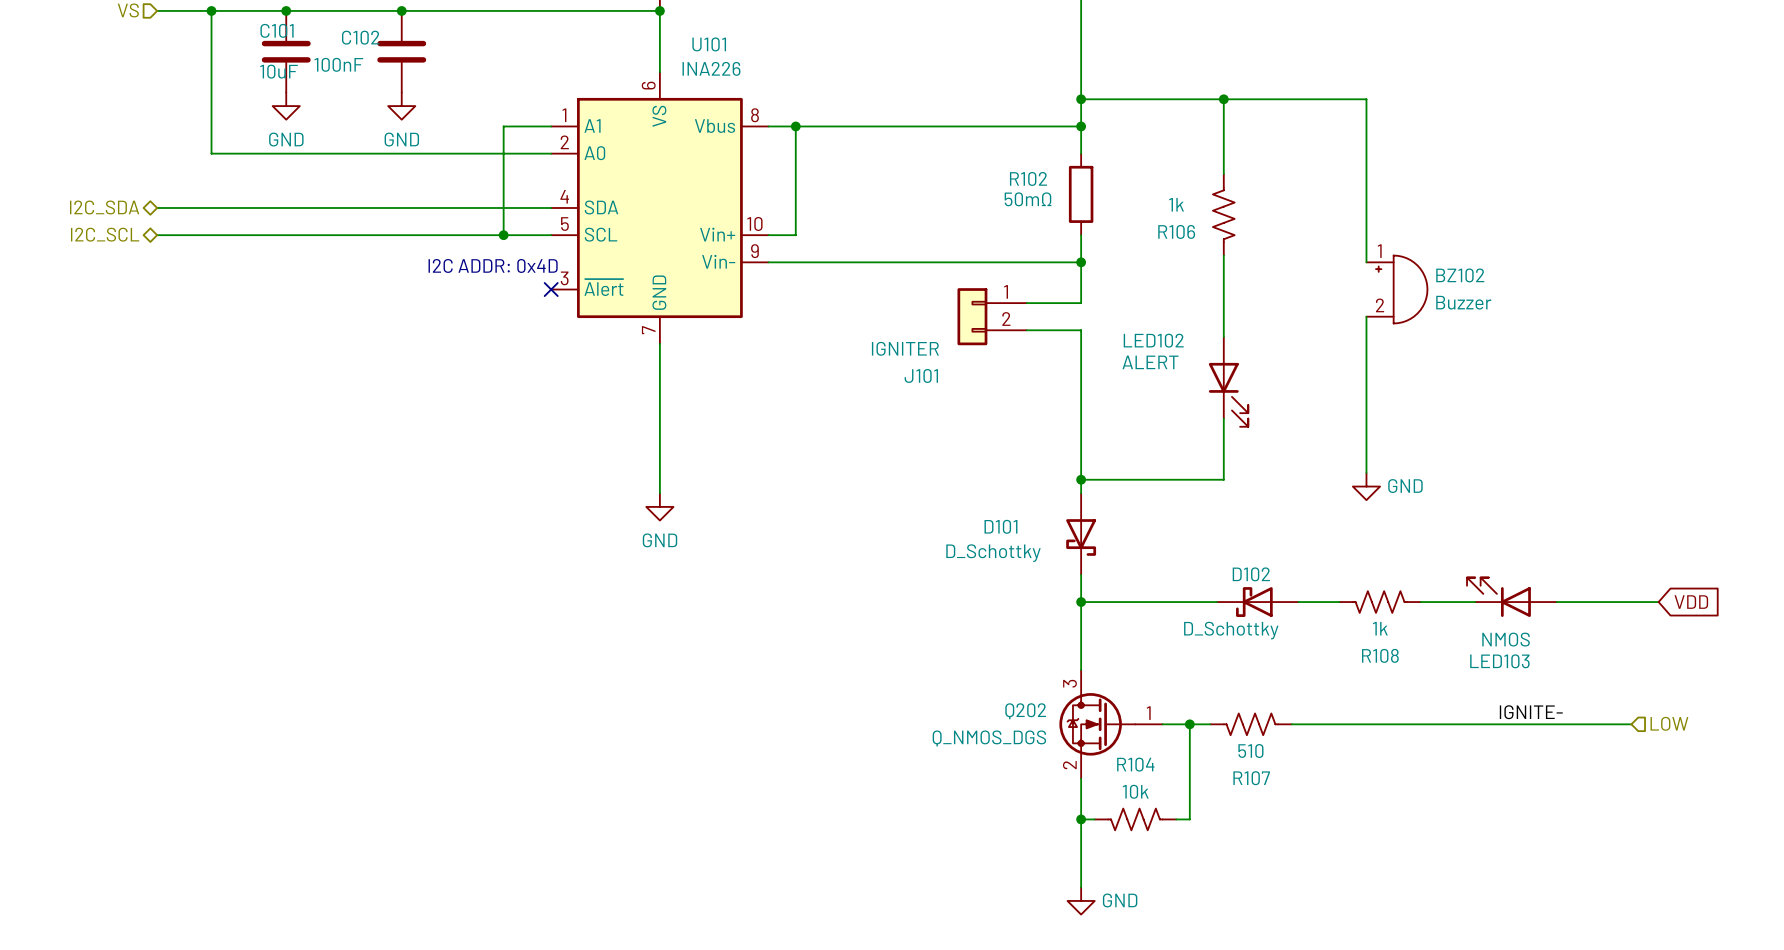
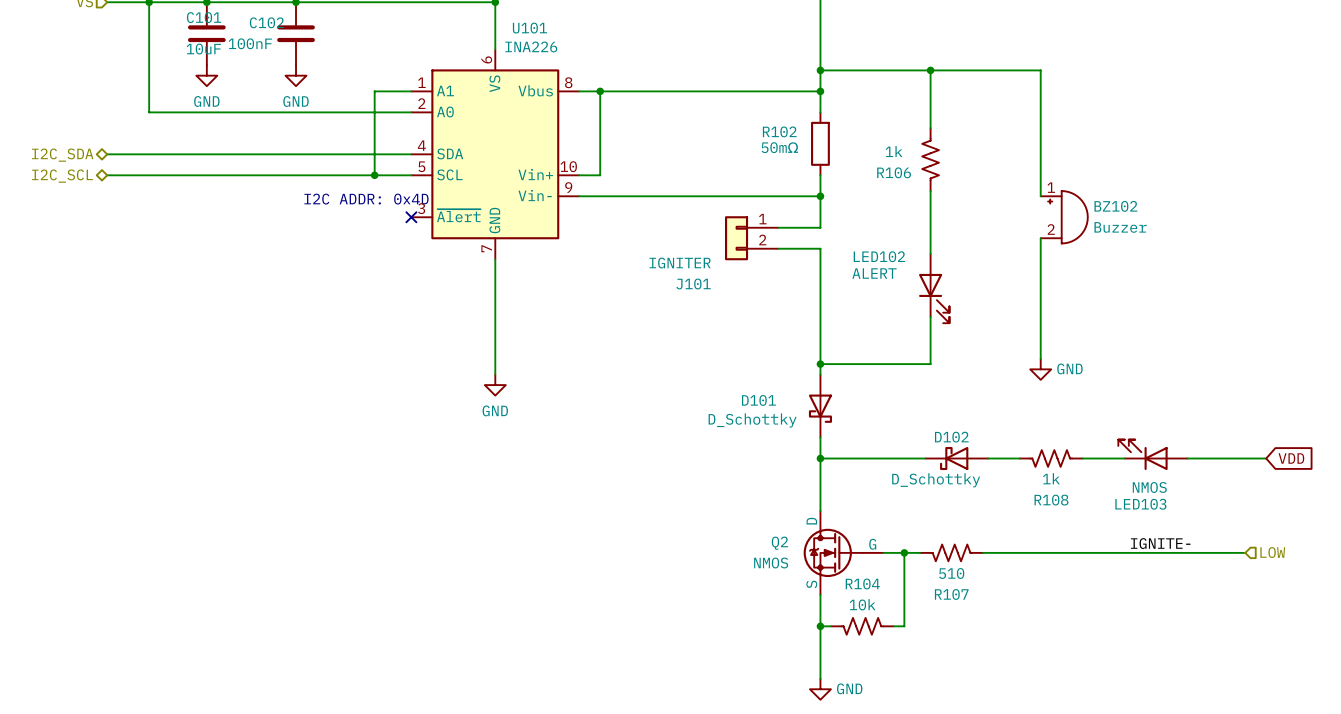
Q202 pin name: none -> D (811, 521)
Q202 pin number: 3 (1069, 683) -> none
Q202 name: Q202 (1025, 711) -> Q2 (779, 543)
Q202 pin number: 1 (1148, 713) -> none
Q202 pin name: none -> G (872, 544)
Q202 value: Q_NMOS_DGS (989, 738) -> NMOS (771, 563)
Q202 pin name: none -> S (811, 584)
Q202 pin number: 2 (1069, 765) -> none

